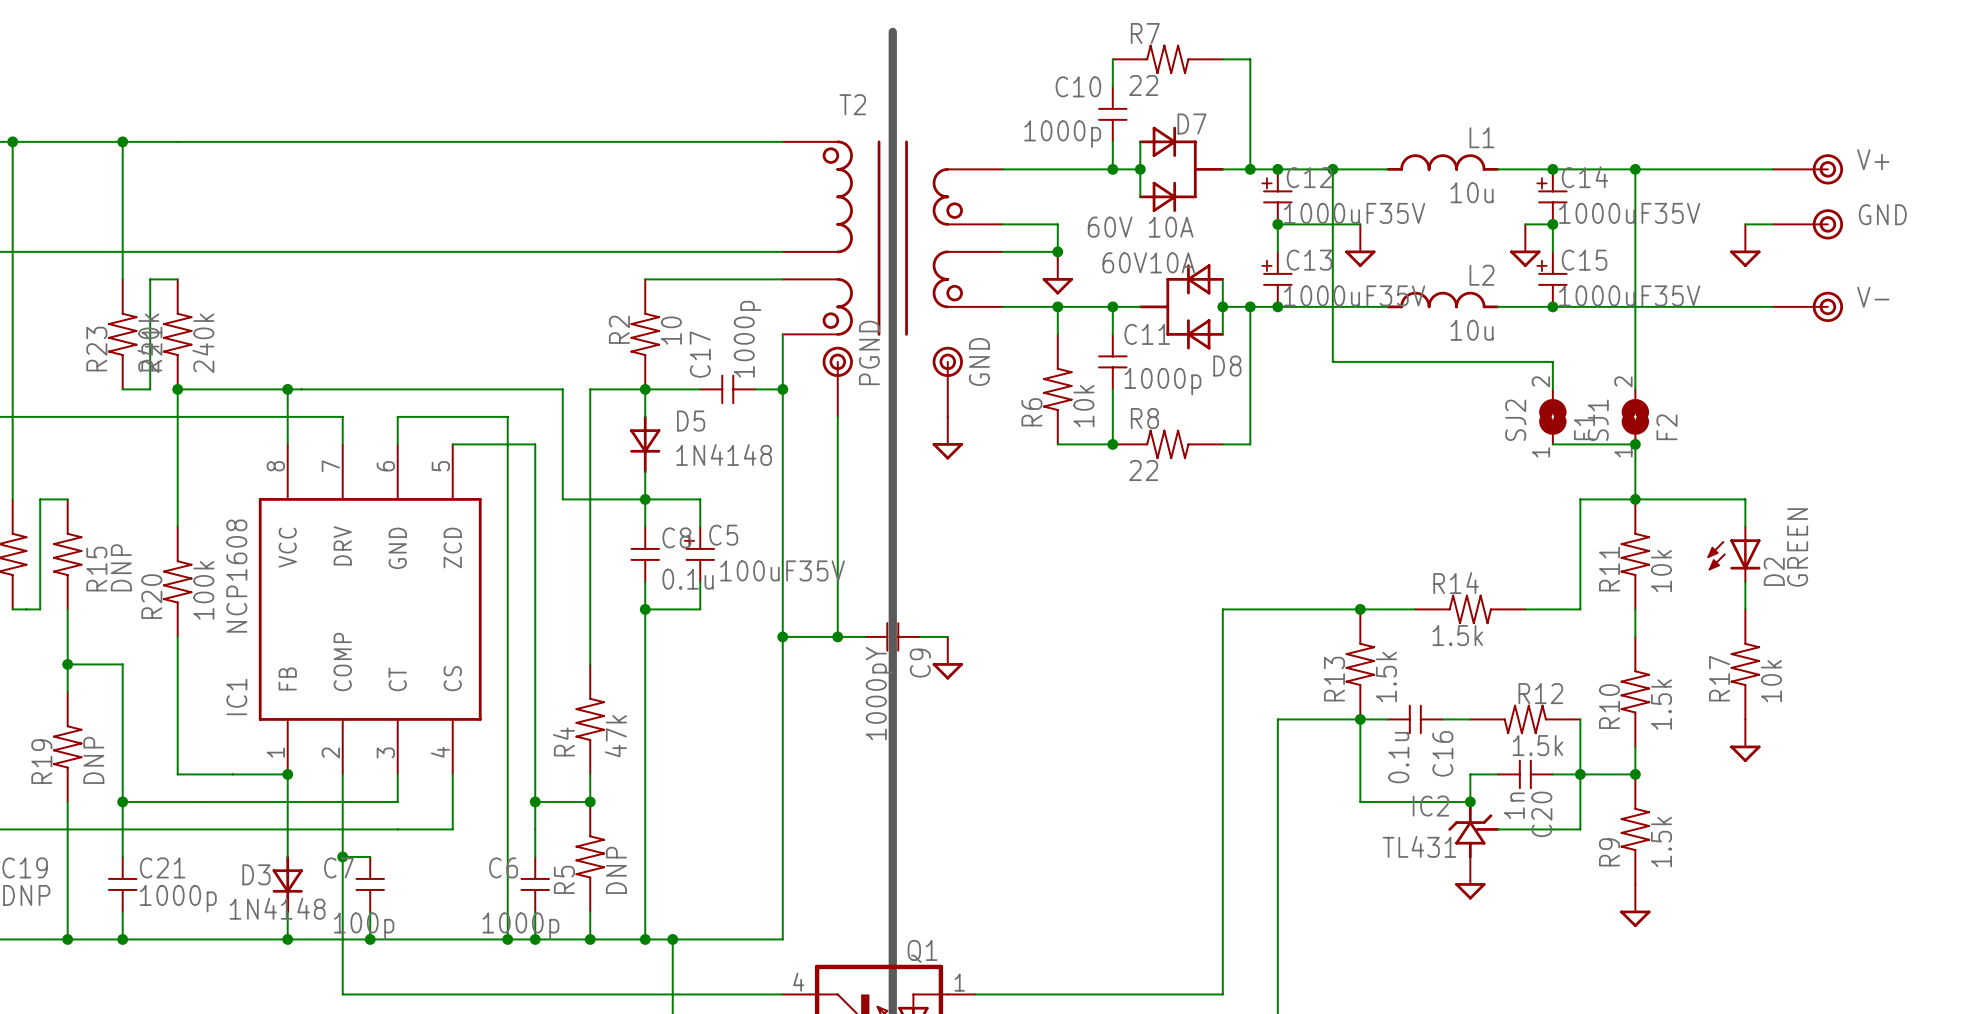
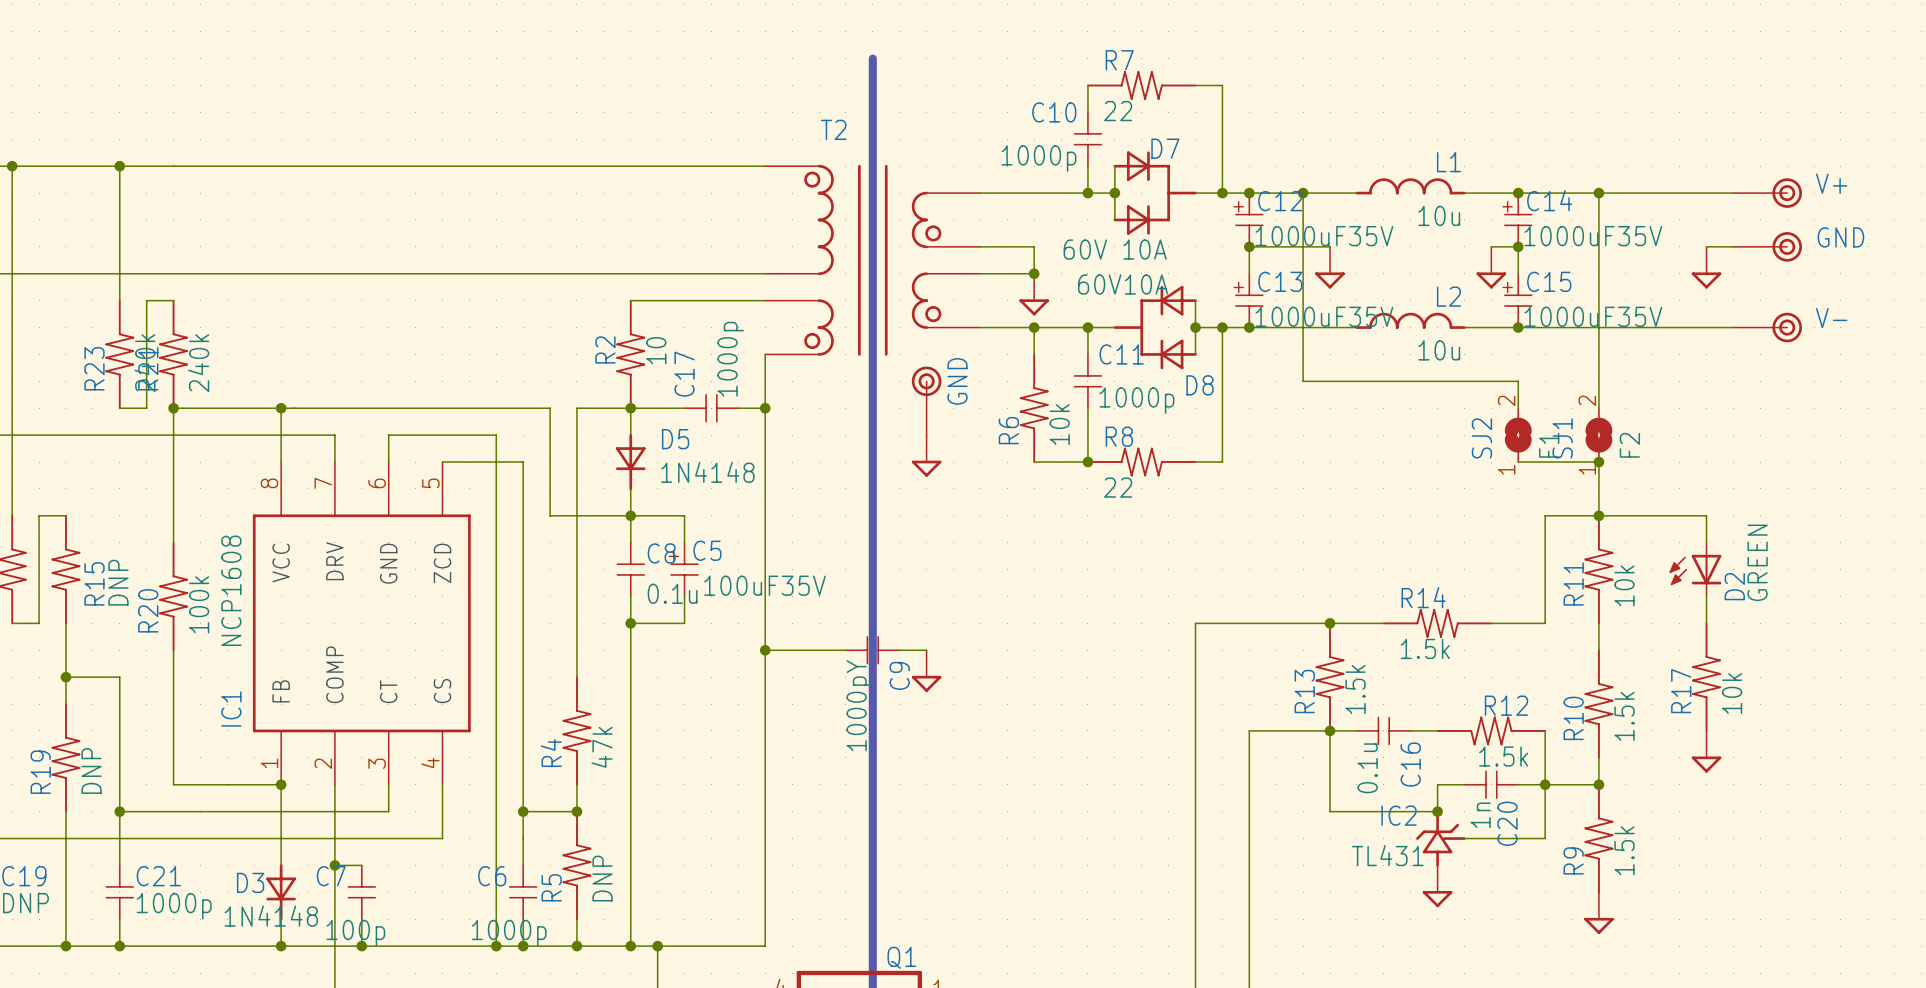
part: PGND (837, 381) -> none
wire: (837, 416) (837, 636) -> none
junction: (837, 636) -> none

